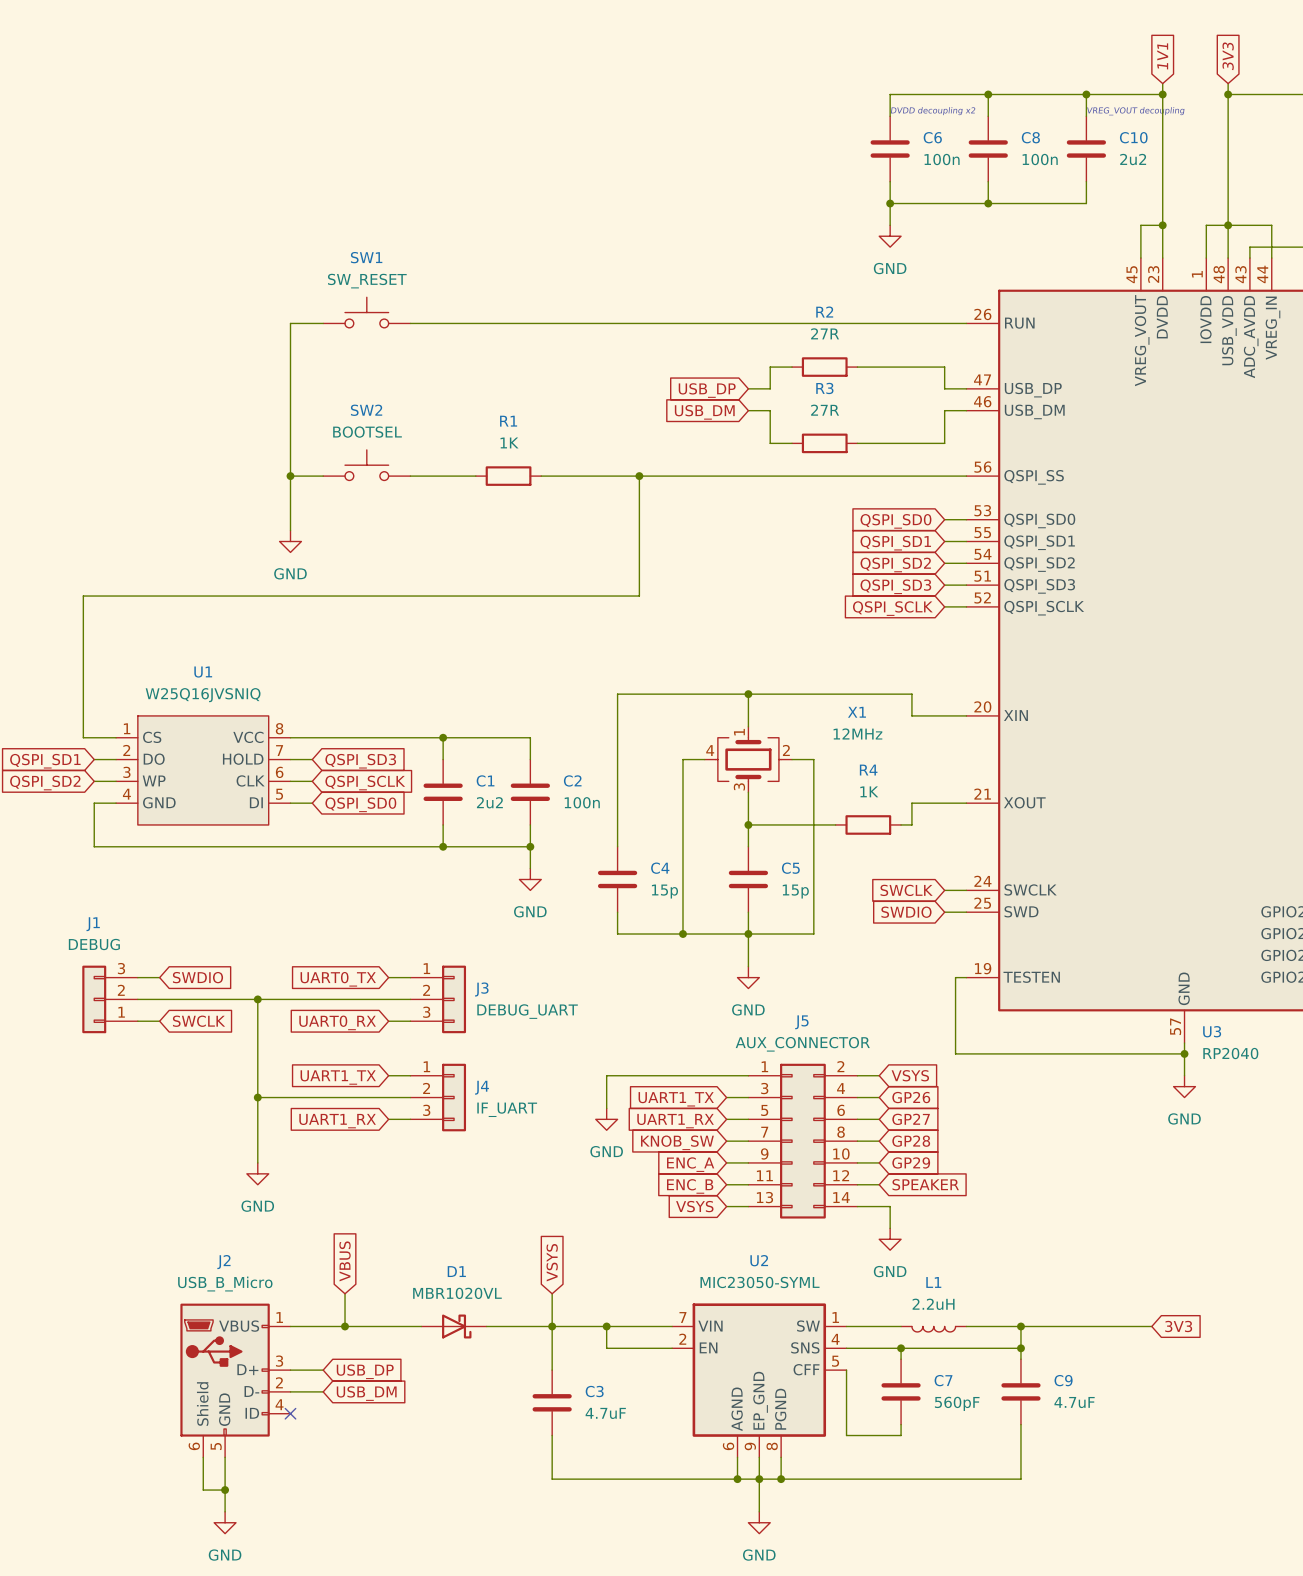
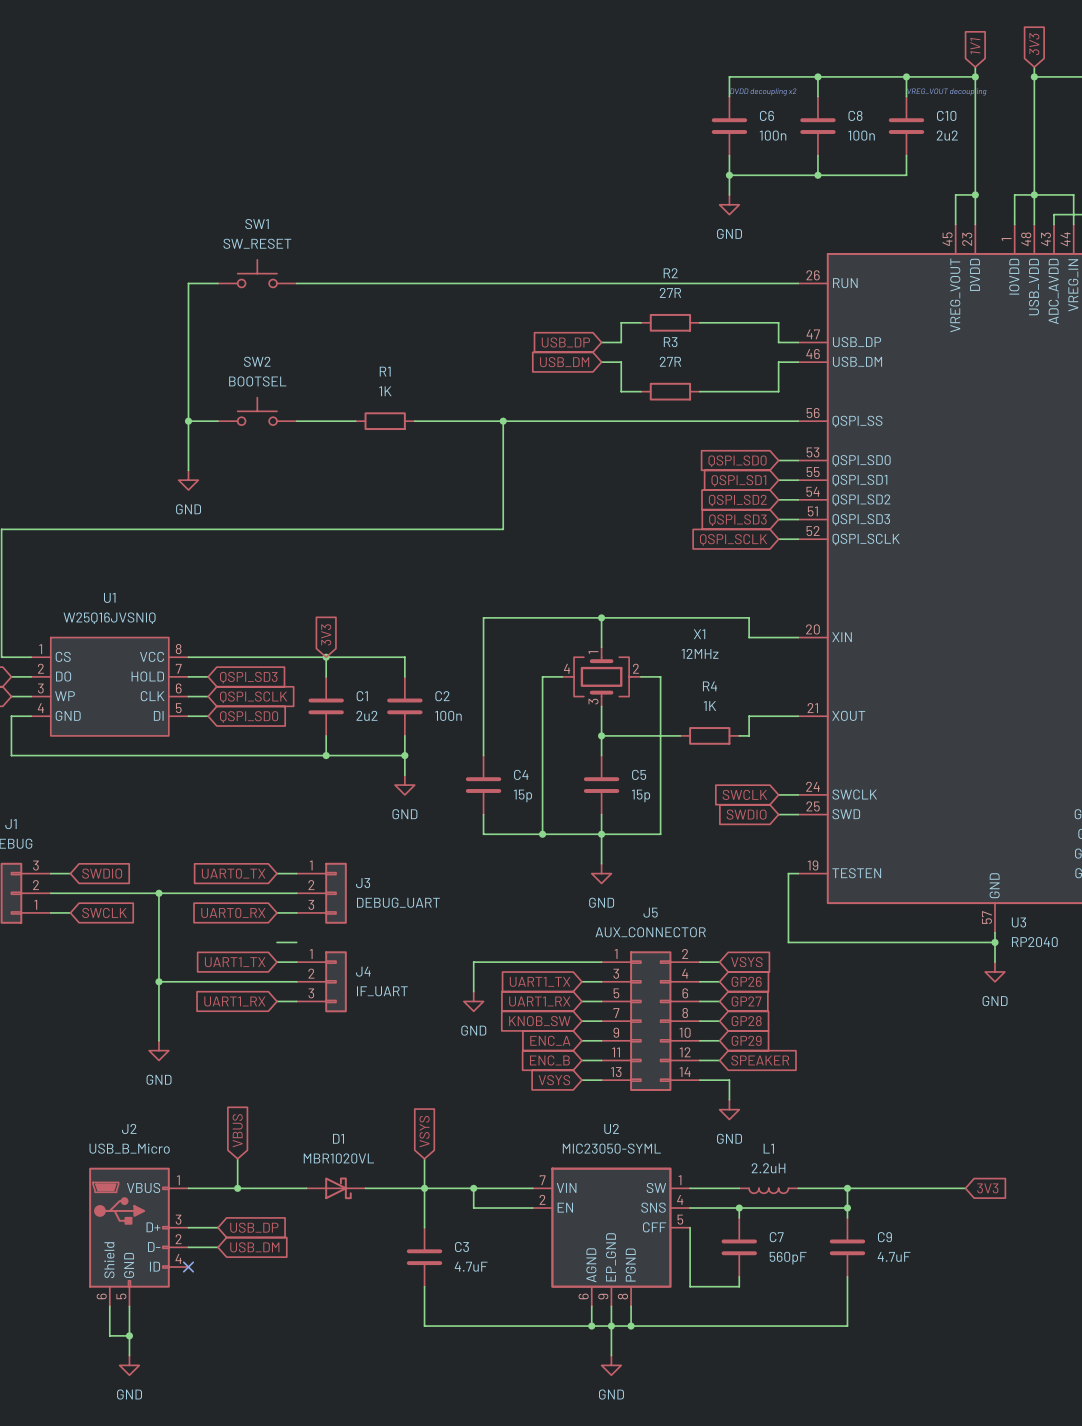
global label: none -> 3V3 (326, 634)
wire: none -> (277, 942) (296, 942)

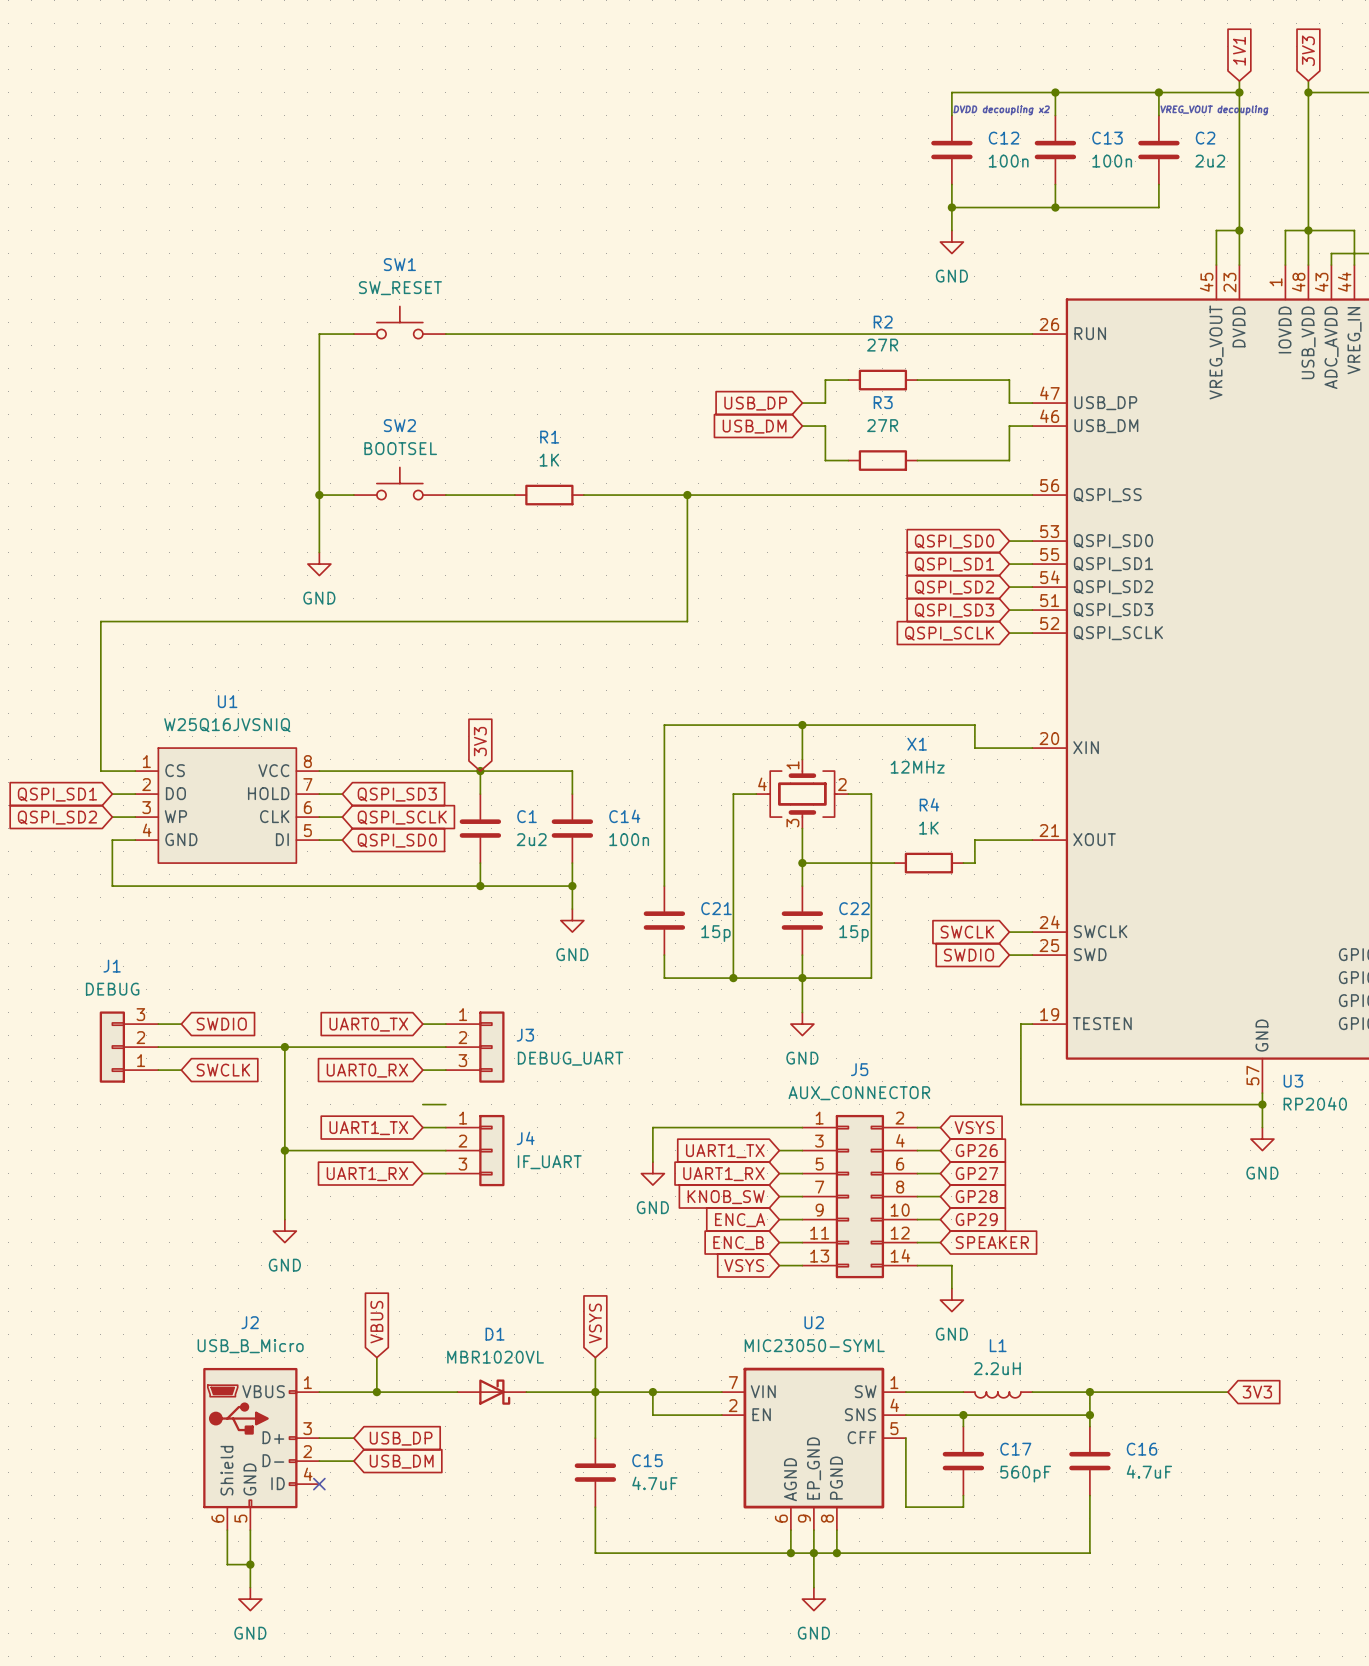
C6 name: C6 (766, 115) -> C12 (1004, 138)
C8 name: C8 (855, 115) -> C13 (1107, 138)
C10 name: C10 (946, 115) -> C2 (1205, 138)
C2 name: C2 (442, 696) -> C14 (624, 816)
C4 name: C4 (521, 774) -> C21 (716, 908)
C5 name: C5 (639, 774) -> C22 (854, 908)
C7 name: C7 (776, 1237) -> C17 (1015, 1449)
C9 name: C9 (884, 1237) -> C16 (1142, 1449)
C3 name: C3 (461, 1247) -> C15 (647, 1460)

